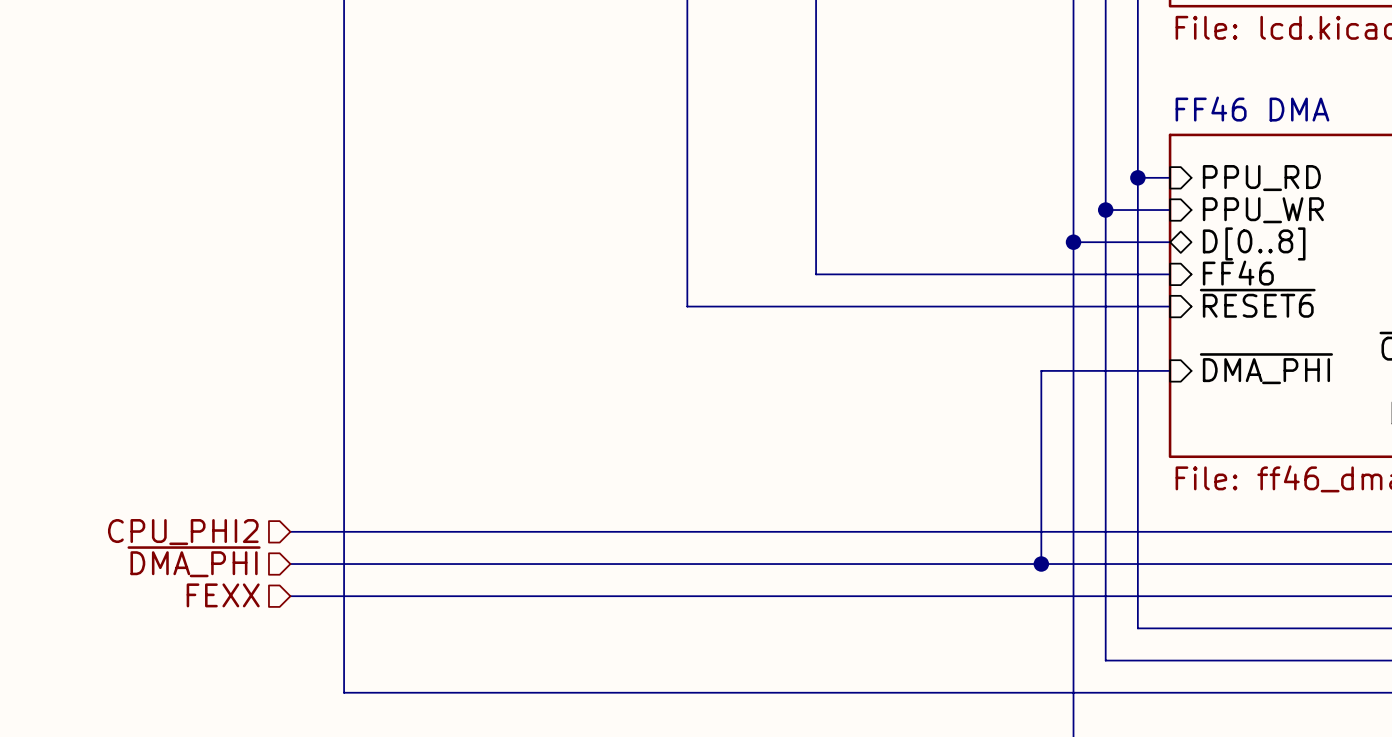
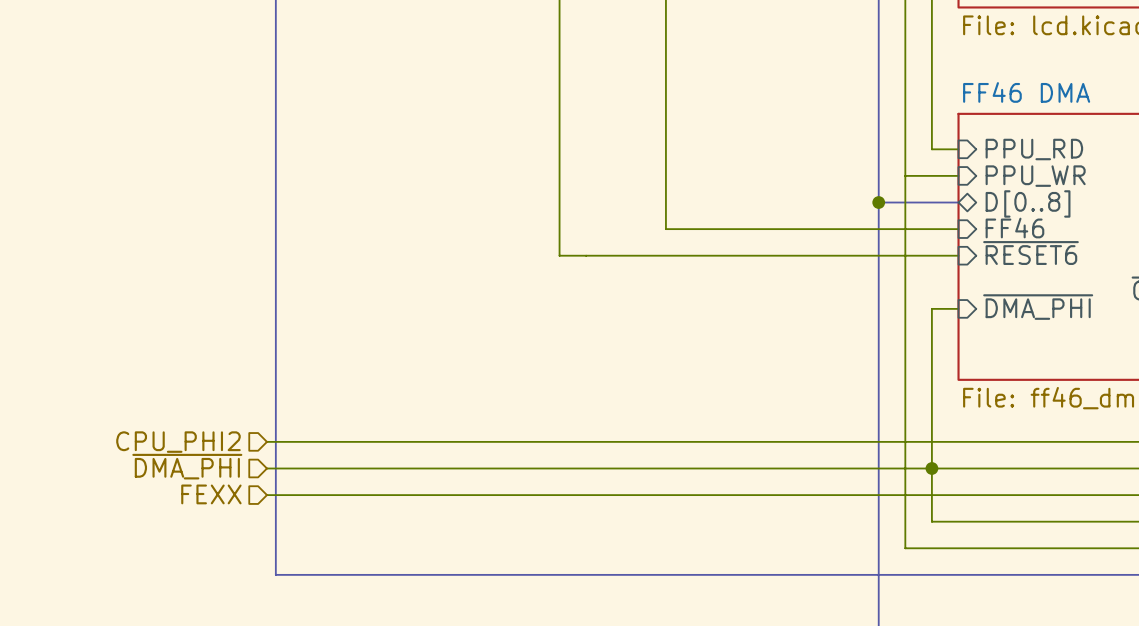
wire: (1137, 177) (1137, 370) (1041, 370) (1041, 564) -> none
junction: (1137, 177) -> none
junction: (1105, 210) -> none
wire: (290, 531) (333, 531) -> none
hierarchical label position: CPU_PHI2 (183, 532) -> CPU_PHI2 (178, 442)
hierarchical label position: ~{DMA_PHI} (194, 561) -> ~{DMA_PHI} (187, 466)
wire: (290, 564) (333, 564) -> none
junction position: (1041, 564) -> (931, 468)
hierarchical label position: FEXX (223, 595) -> FEXX (211, 494)
wire: (290, 596) (333, 596) -> none

